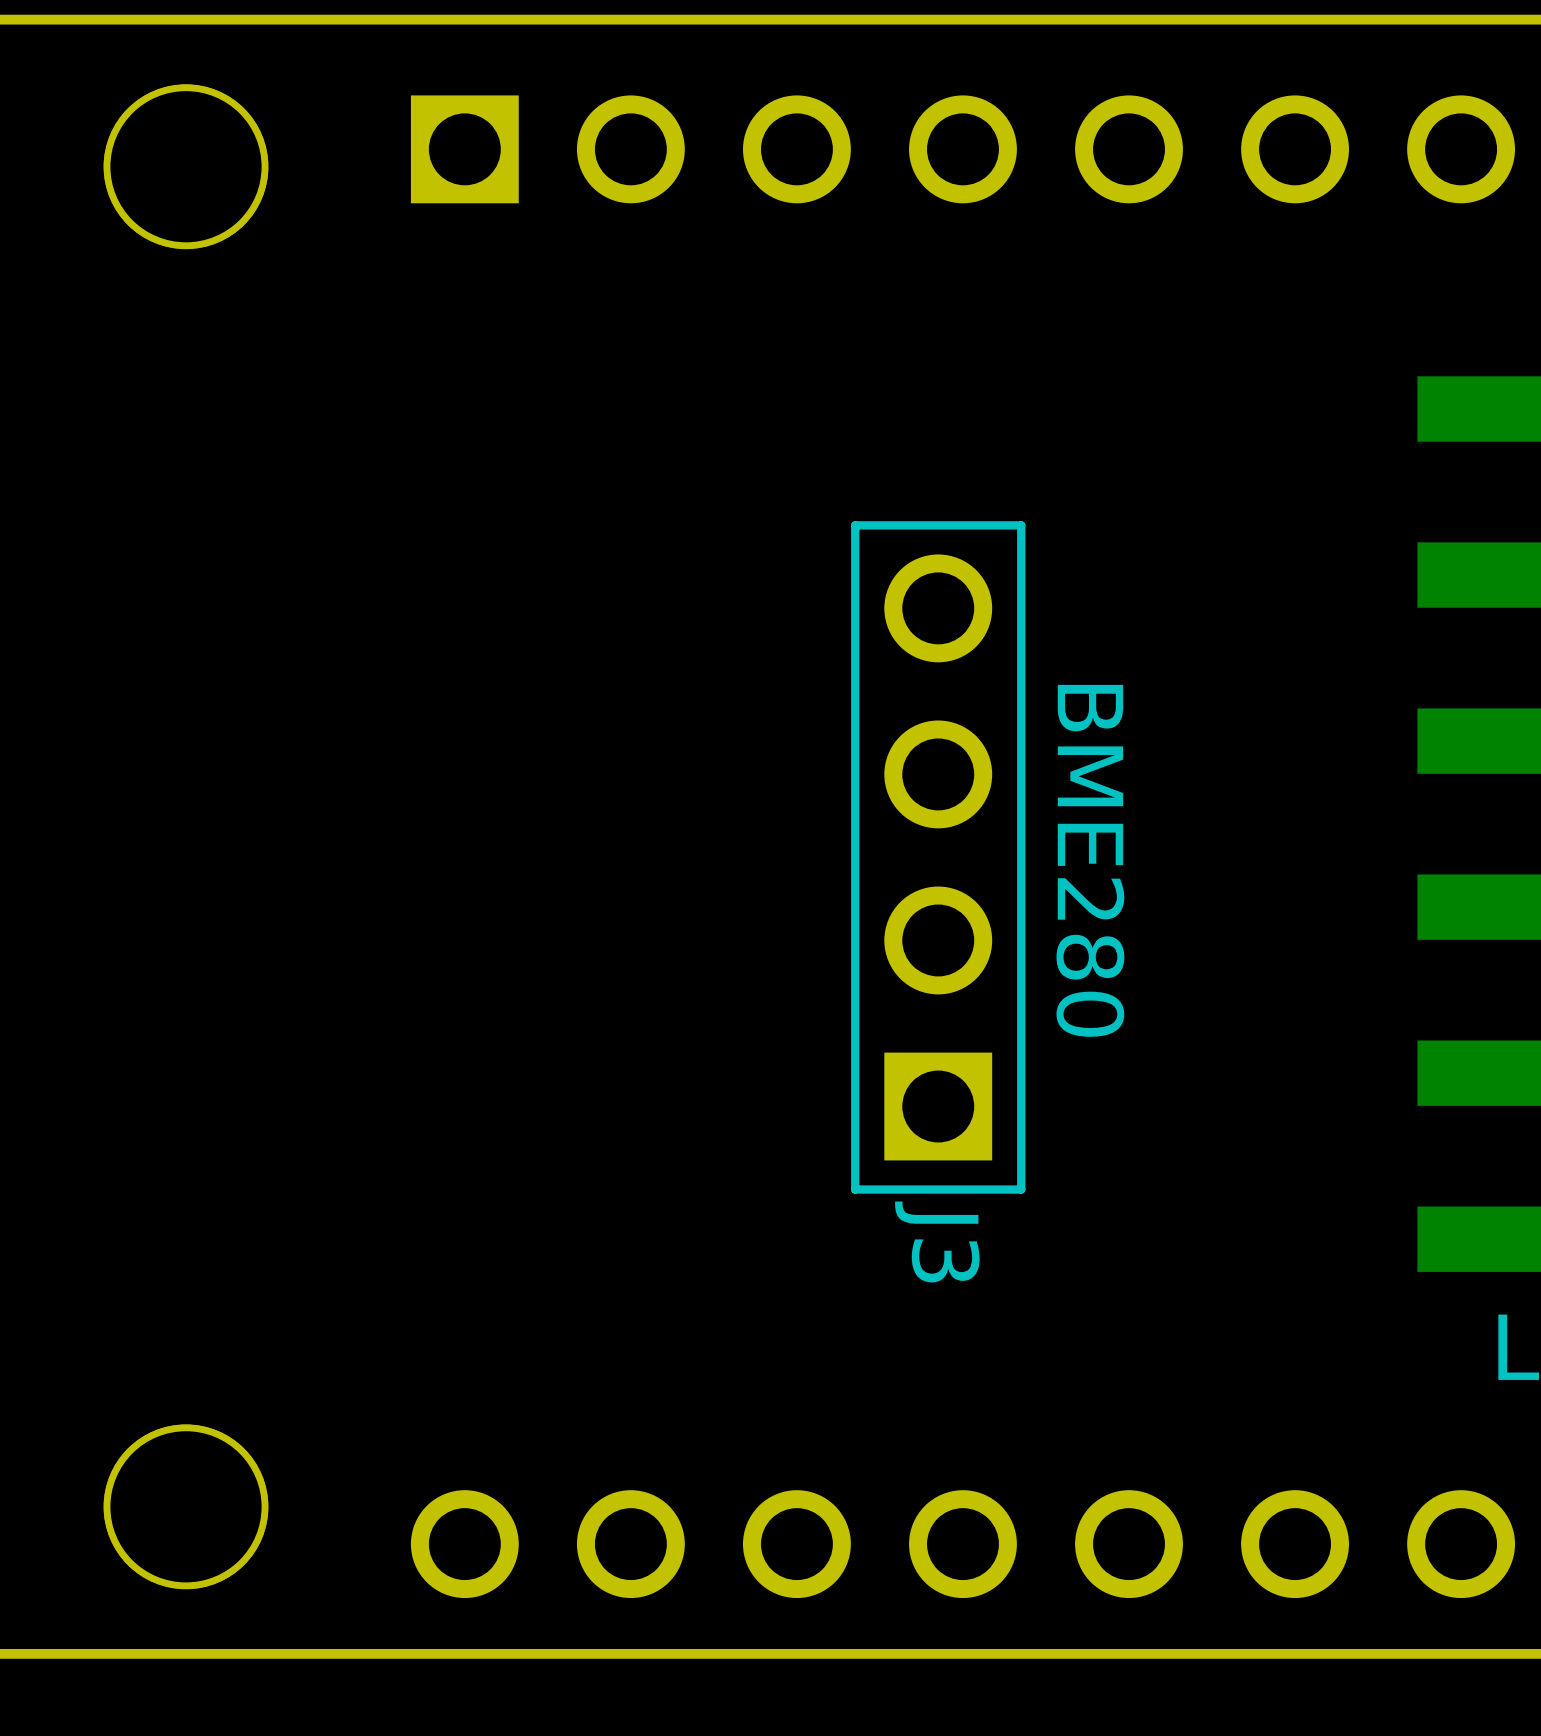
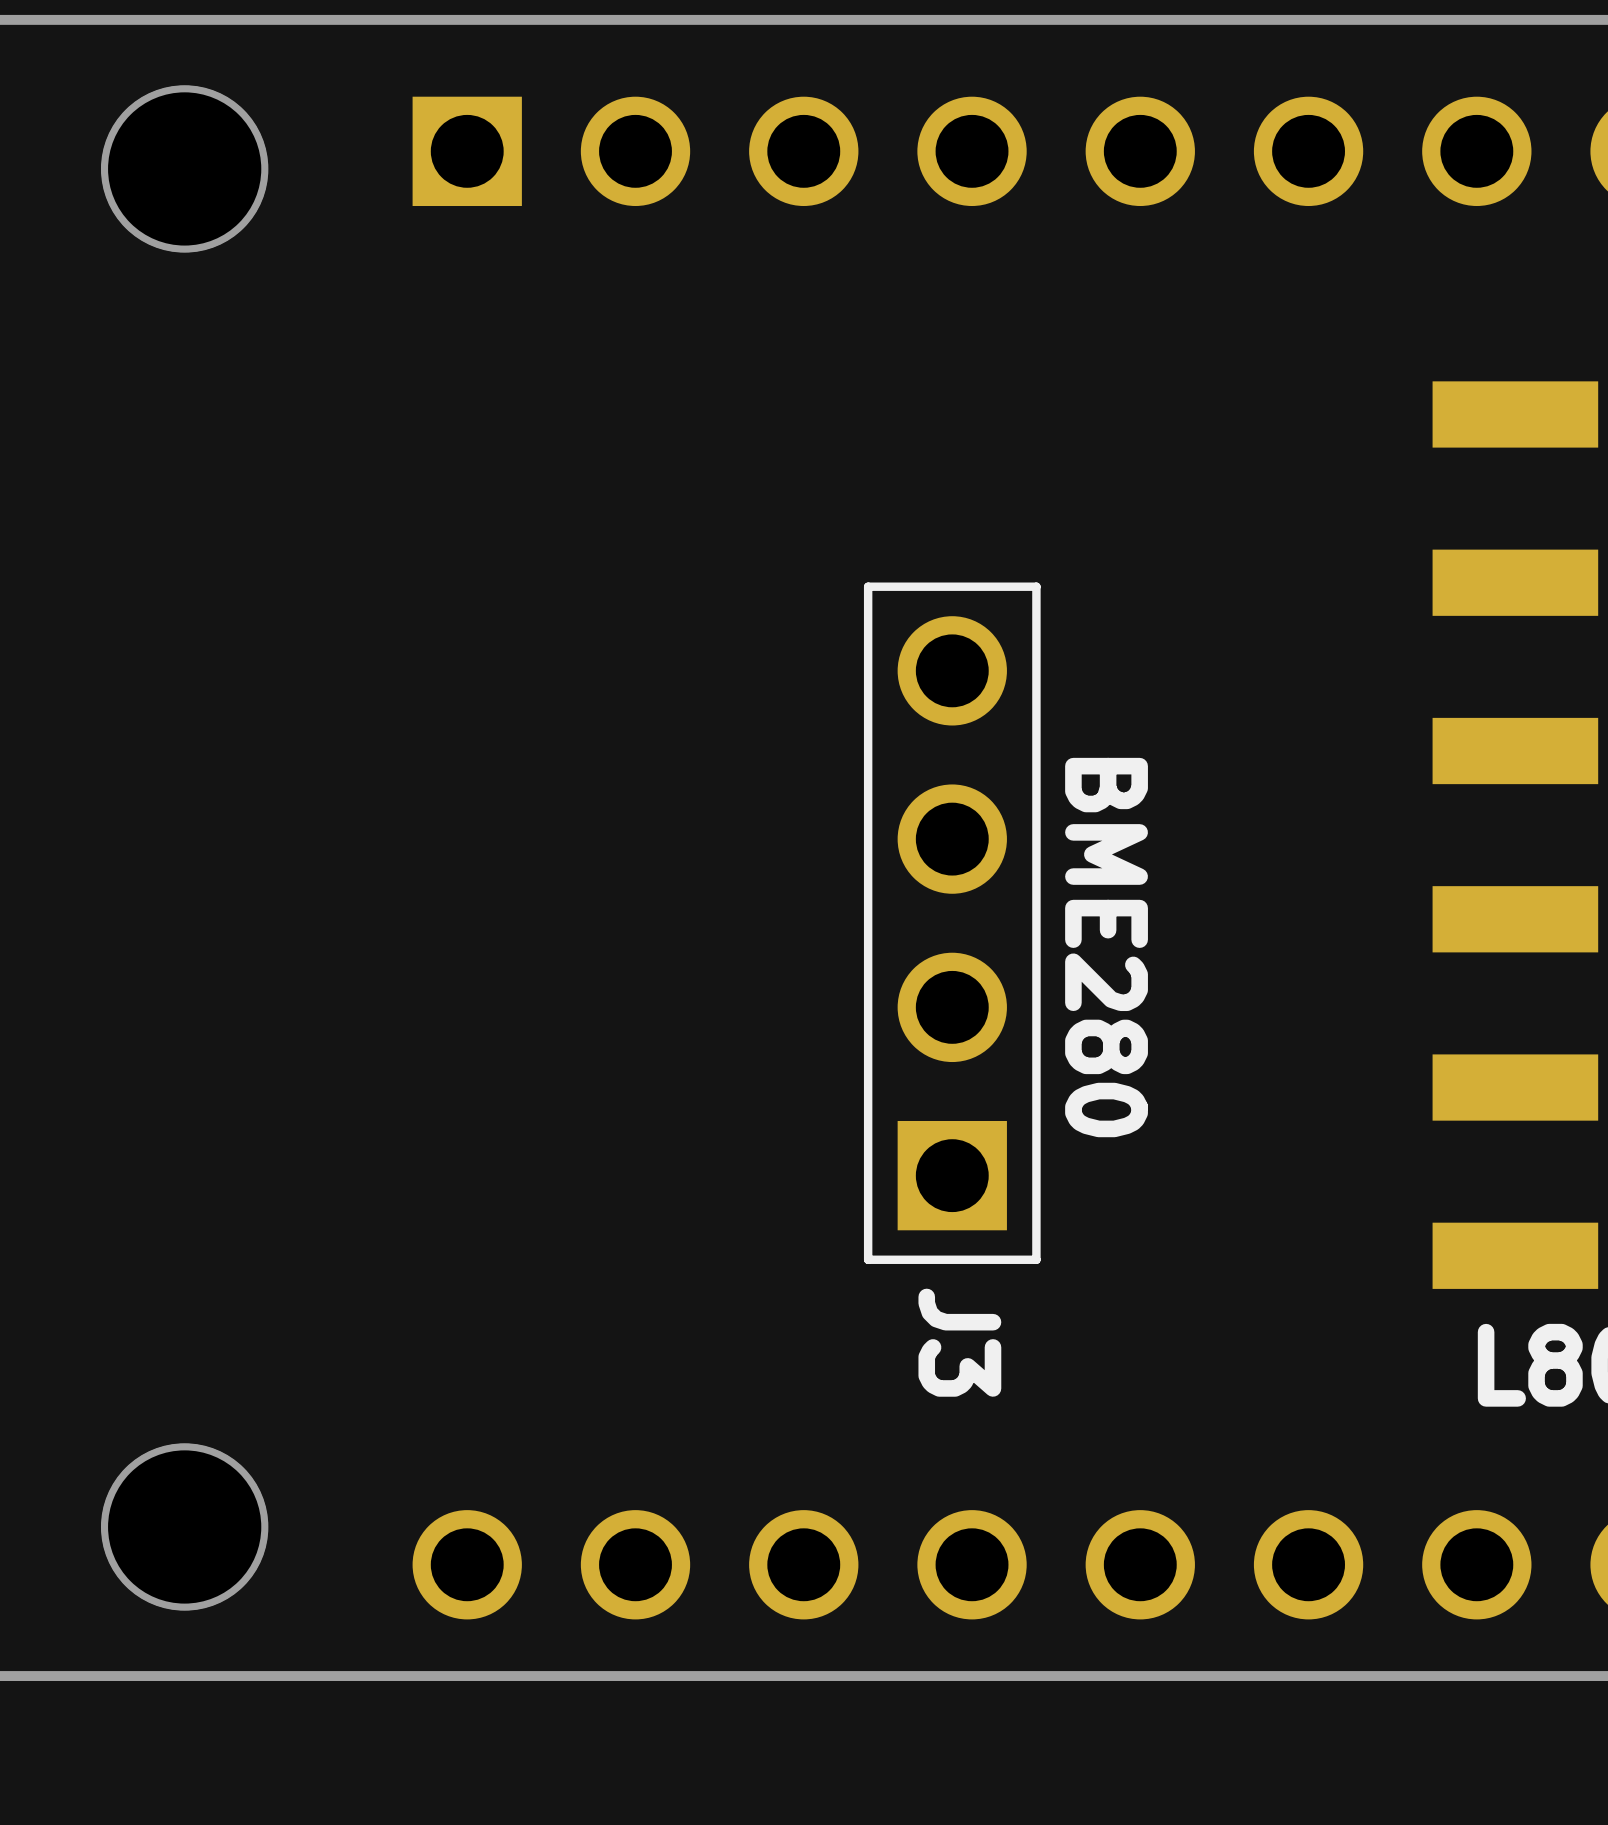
J3 position: (938, 857) -> (952, 923)

